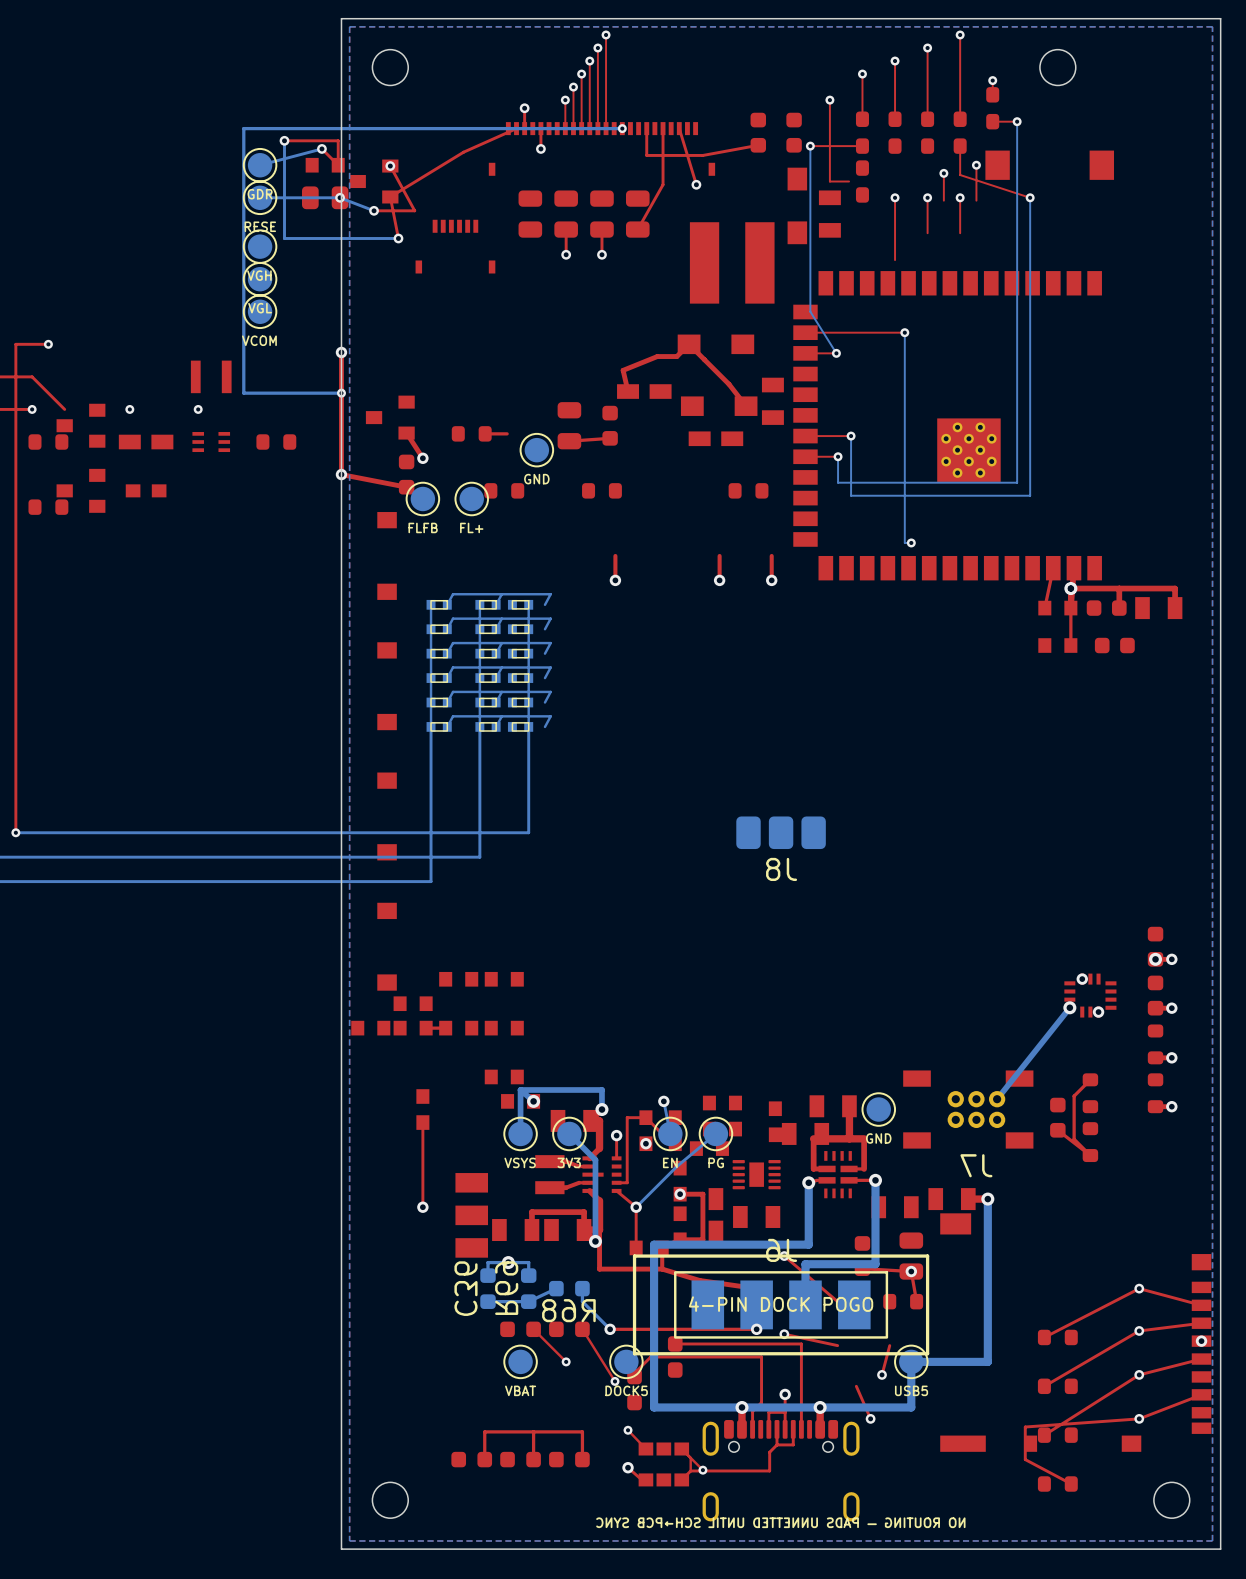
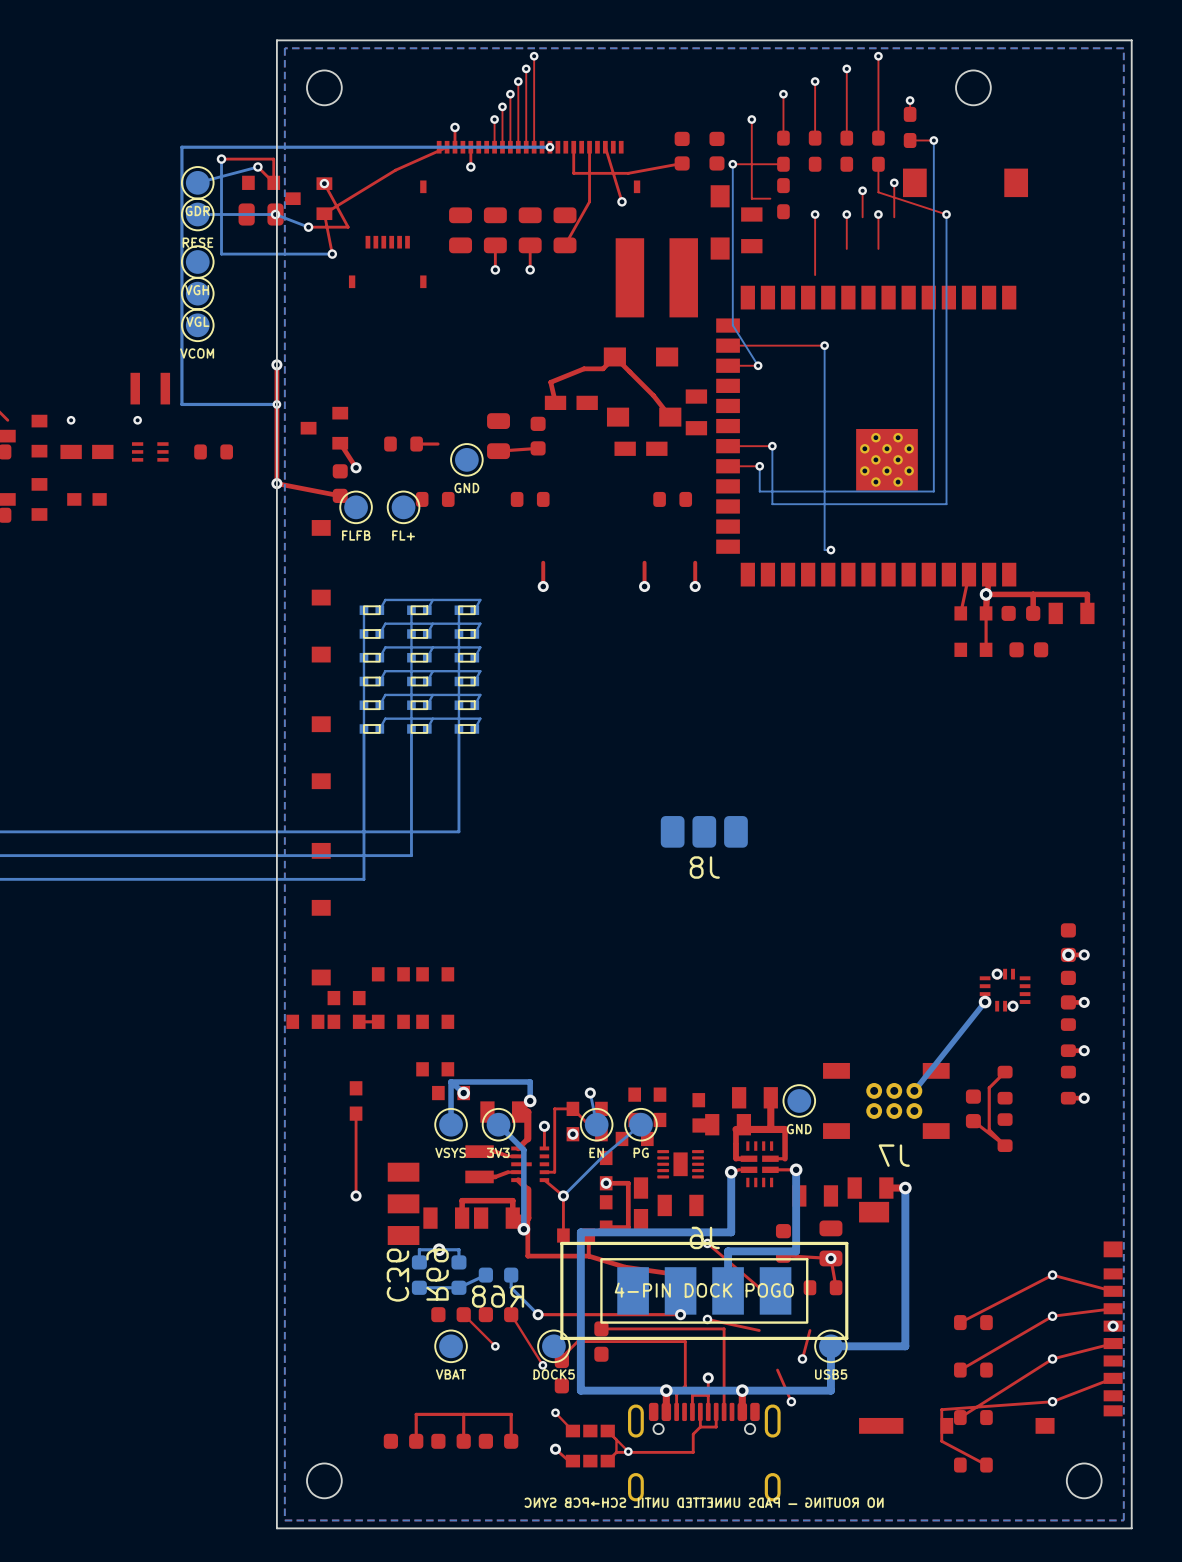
part: (520, 604) -> none
part: none -> (466, 610)
part: (520, 629) -> none
part: none -> (466, 633)
part: (520, 653) -> none
part: none -> (466, 657)
part: (520, 678) -> none
part: none -> (466, 681)
part: (520, 702) -> none
part: none -> (466, 705)
part: (520, 726) -> none
part: none -> (466, 728)

